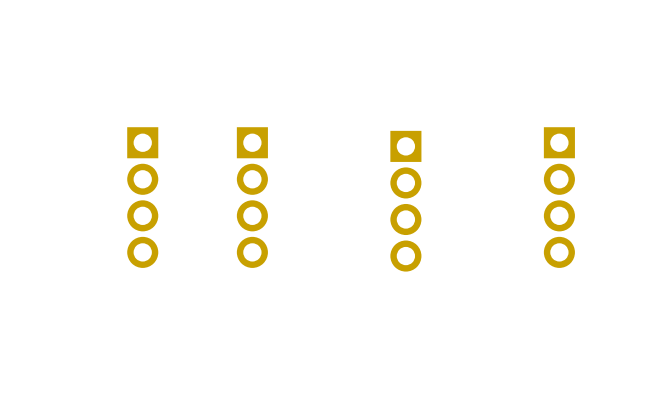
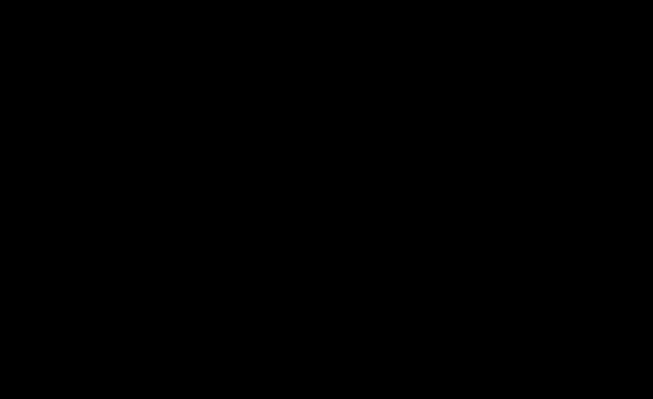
part: (142, 197) -> none
part: (252, 197) -> none
part: (559, 197) -> none
part: (405, 201) -> none

